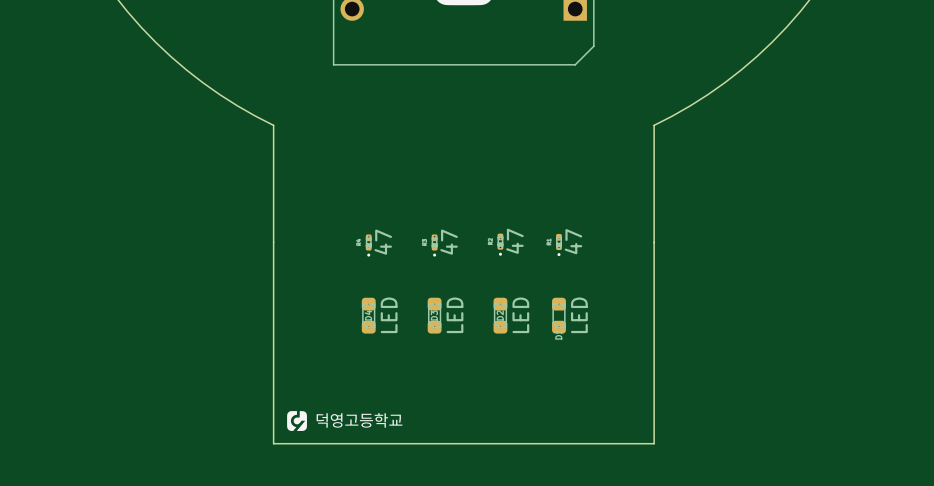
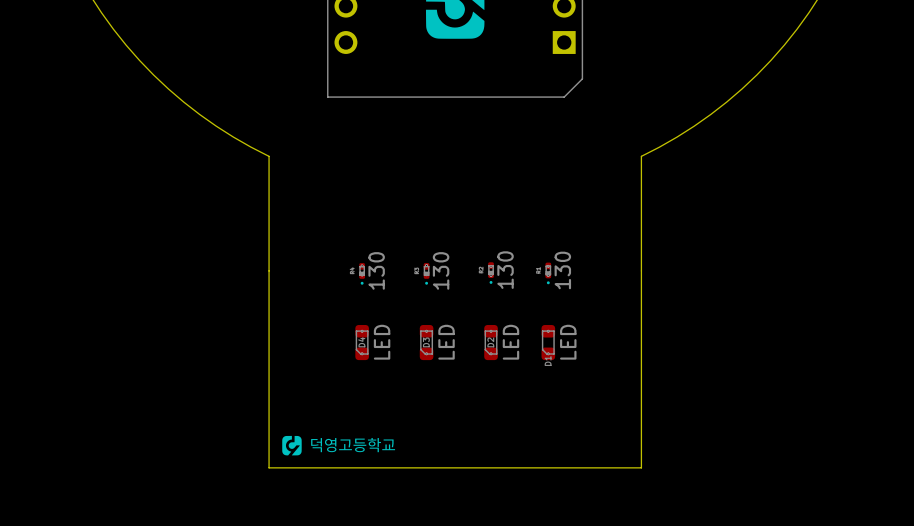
part value: 47 (514, 241) -> 130 (505, 270)
part value: 47 (573, 241) -> 130 (562, 270)
part value: 47 (383, 242) -> 130 (376, 270)
part value: 47 (449, 242) -> 130 (441, 270)

